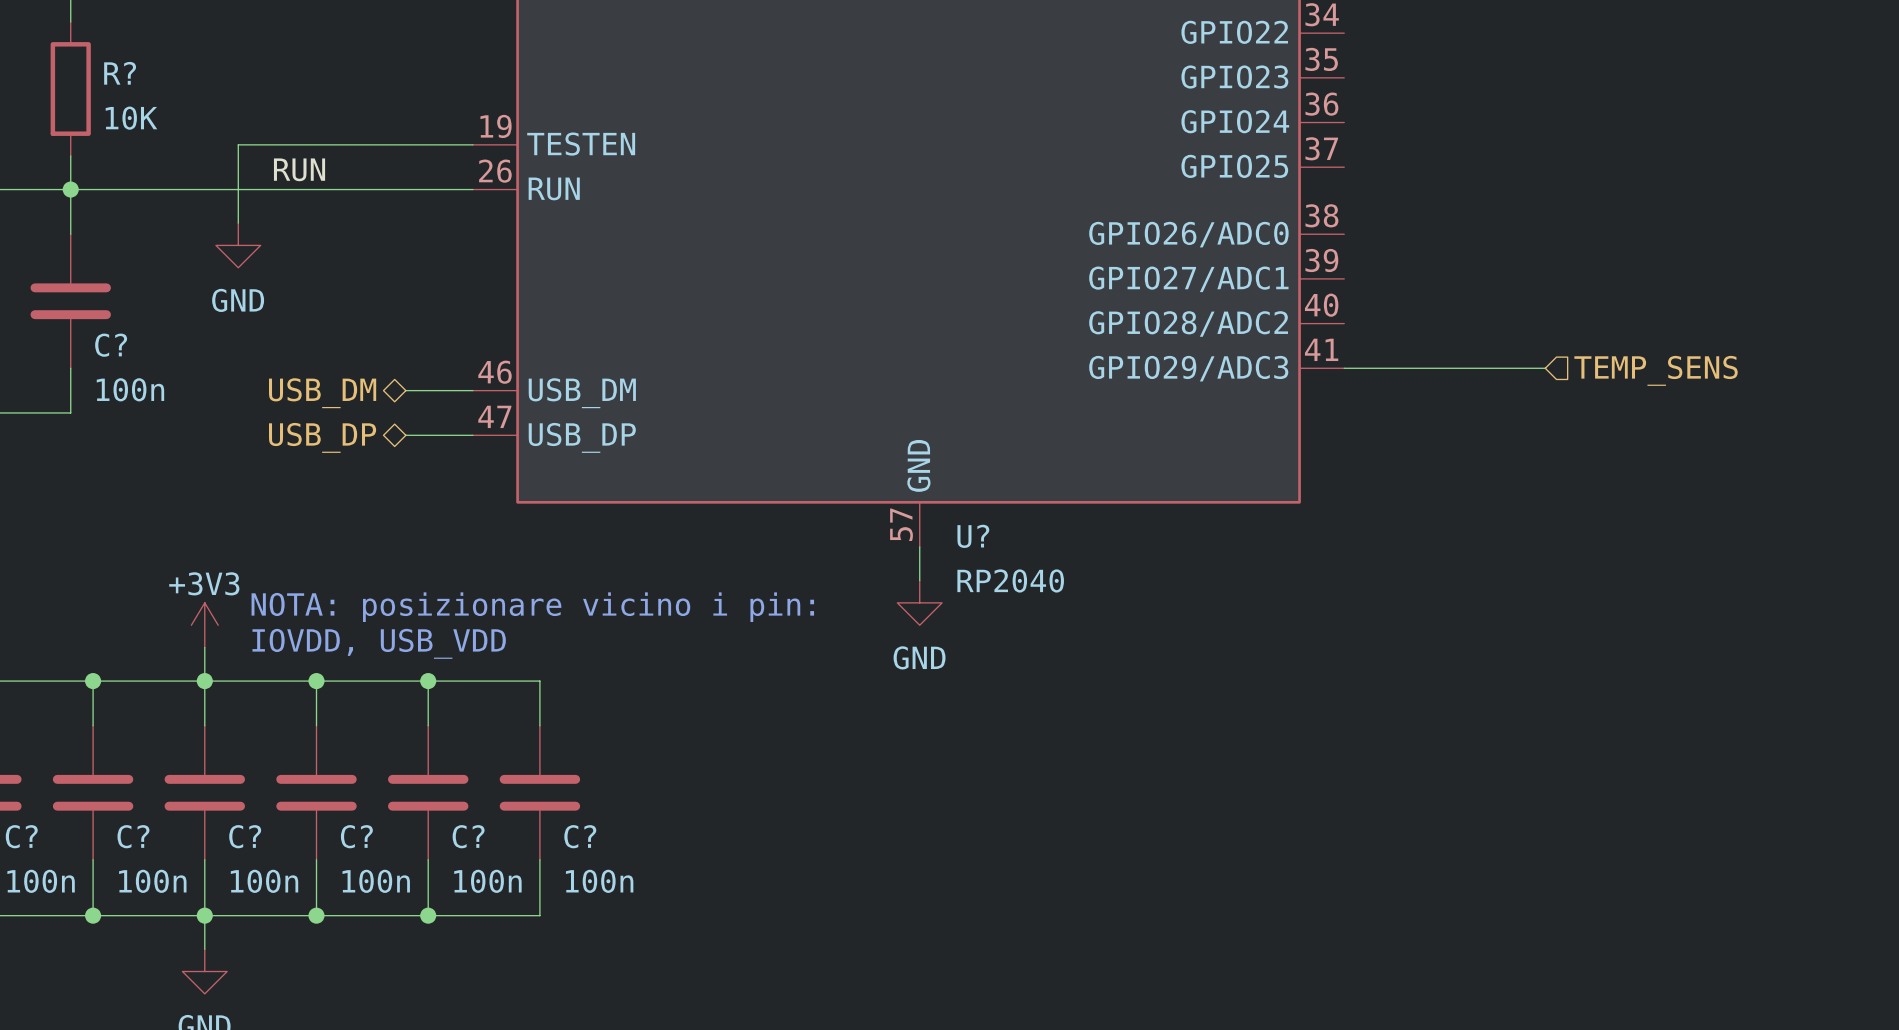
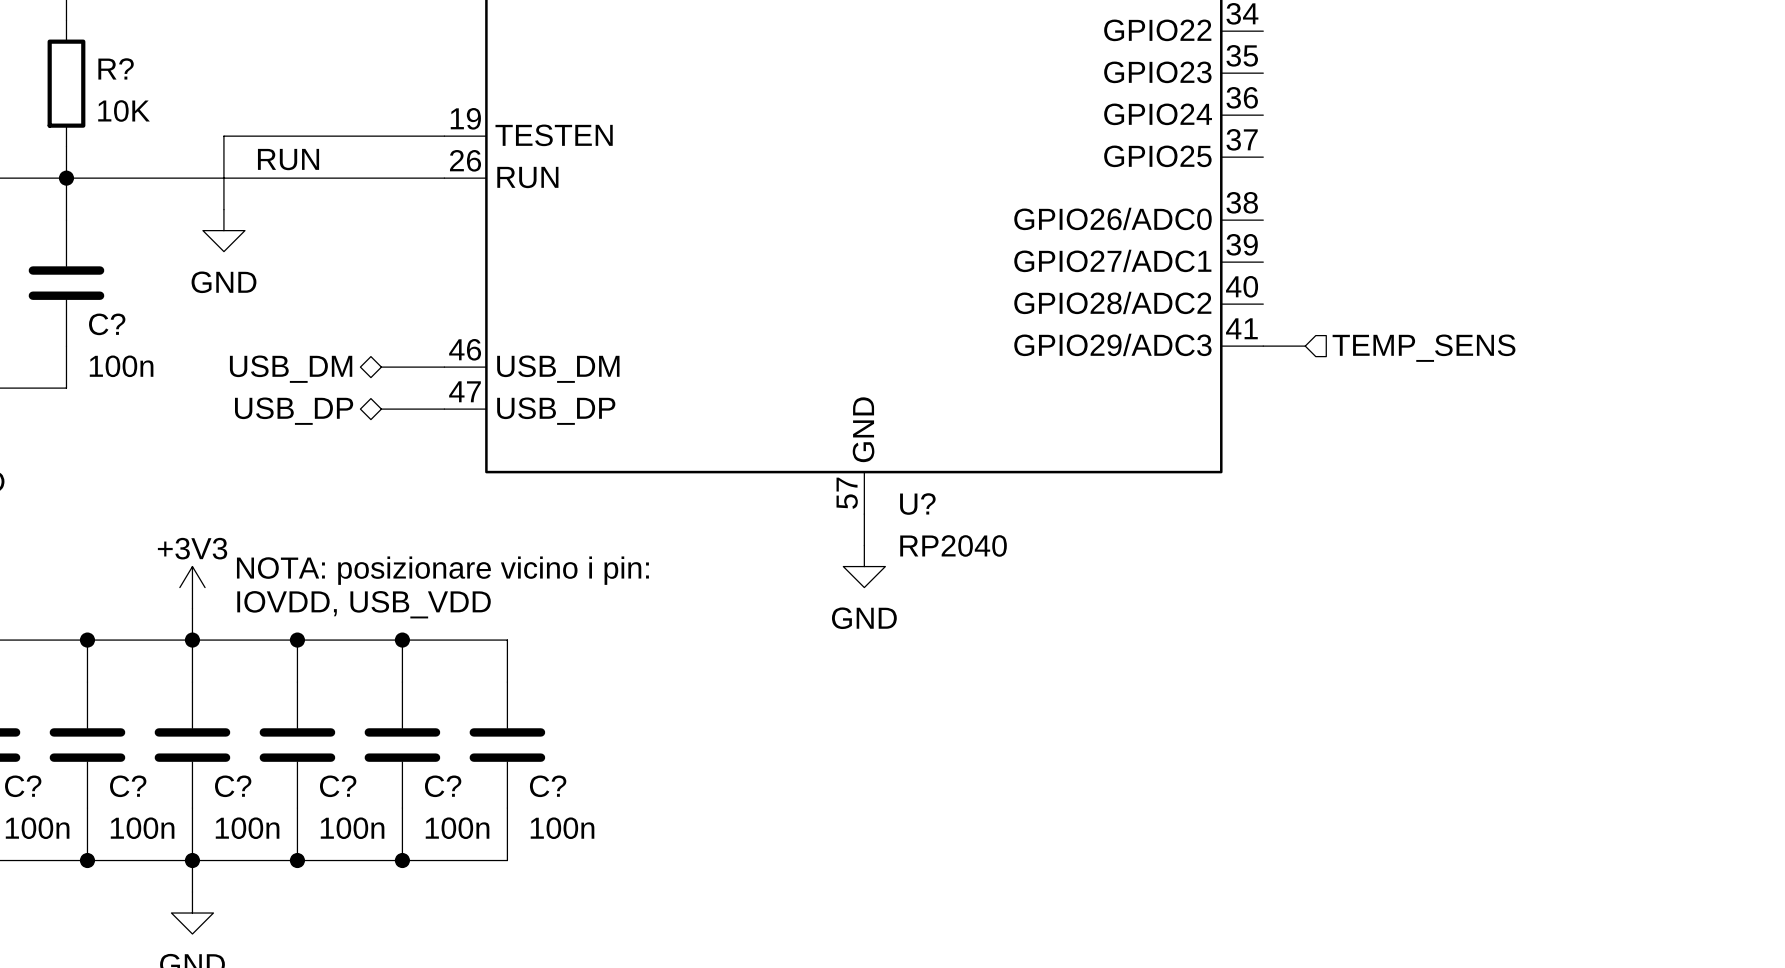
wire: (1388, 368) (1545, 368) -> none
hierarchical label position: TEMP_SENS (1656, 370) -> TEMP_SENS (1424, 348)

